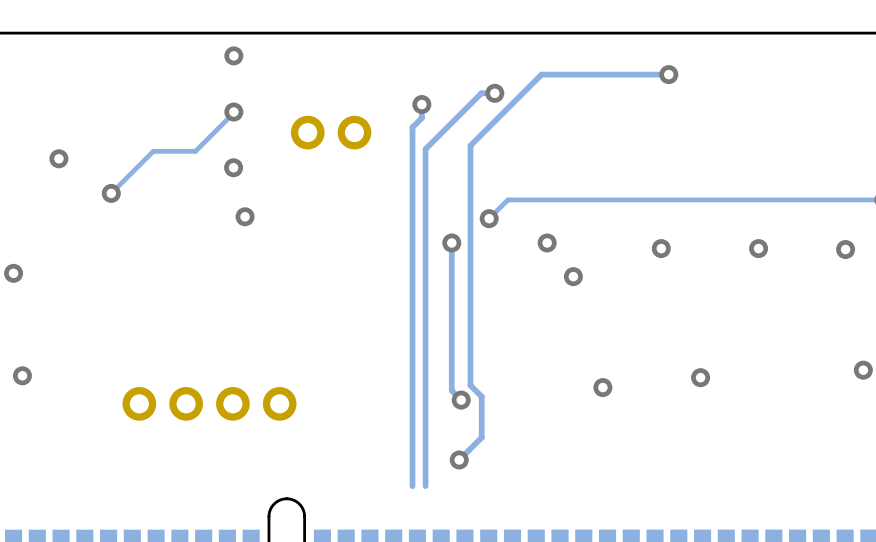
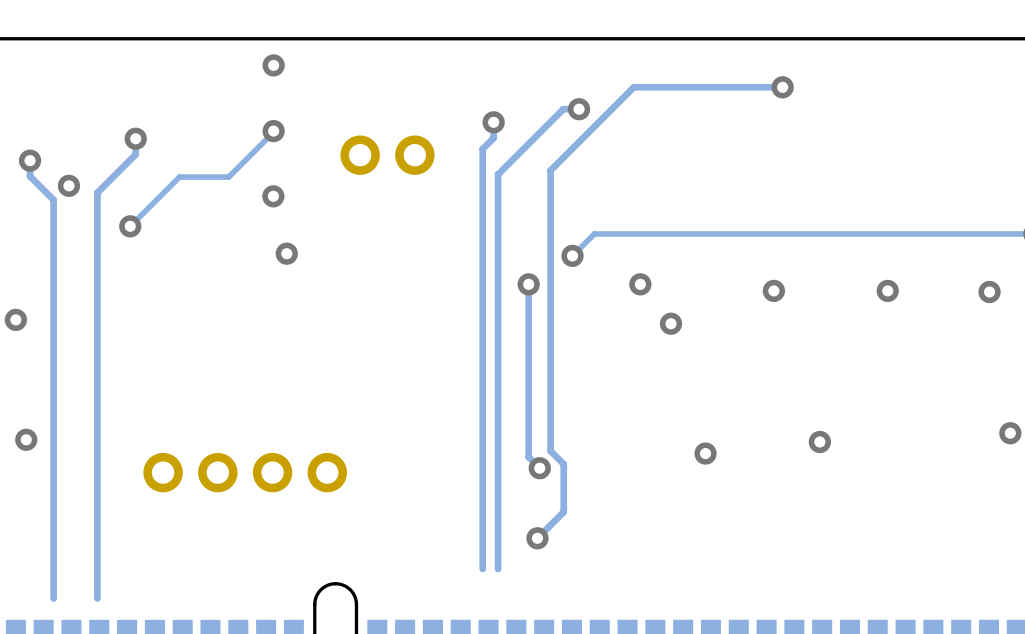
track: none -> (135, 138) (135, 154) (97, 192) (97, 598)
via: none -> (135, 138)
track: none -> (30, 160) (30, 176) (53, 199) (53, 598)
via: none -> (30, 160)

